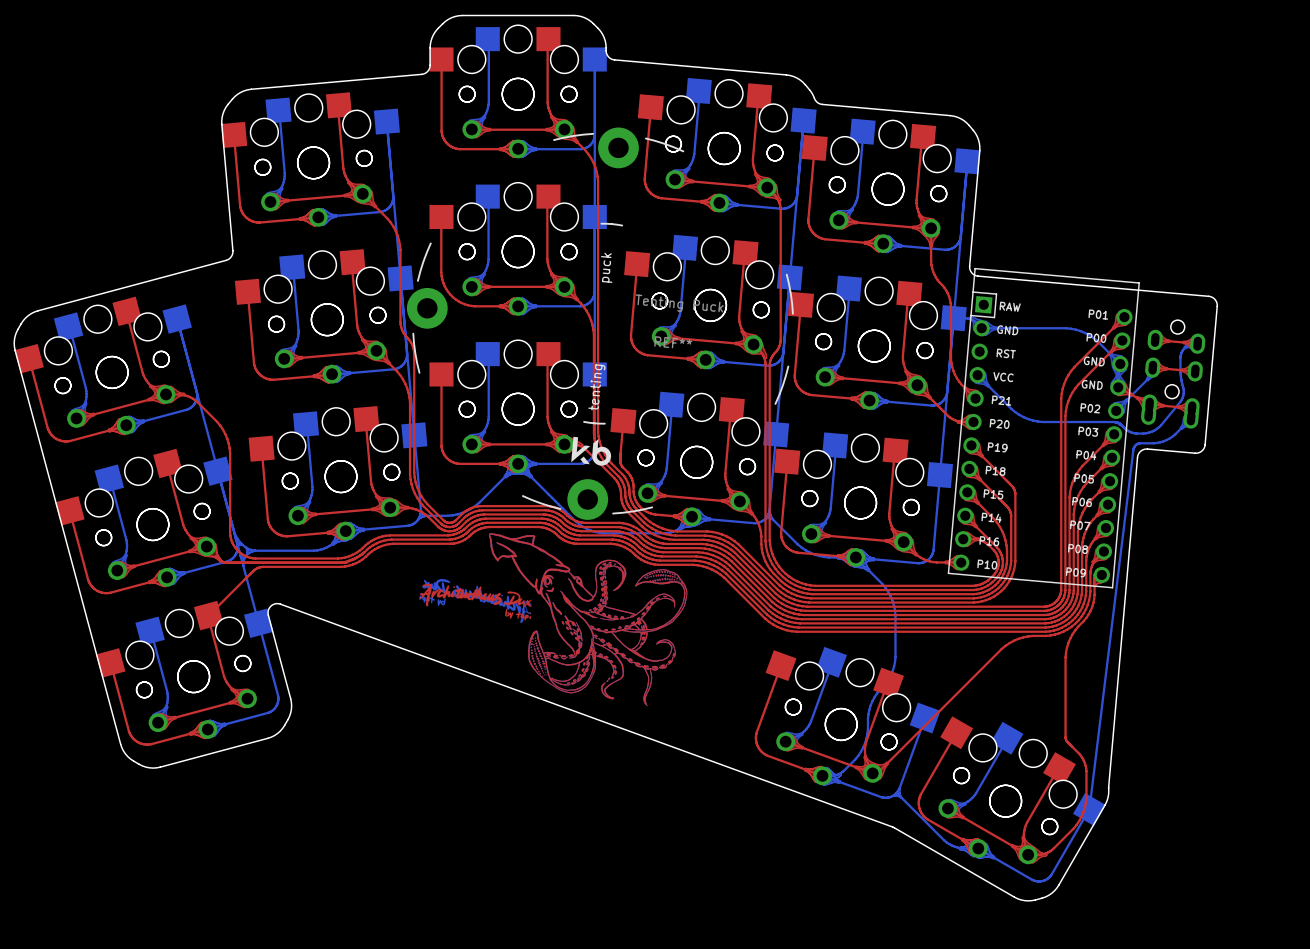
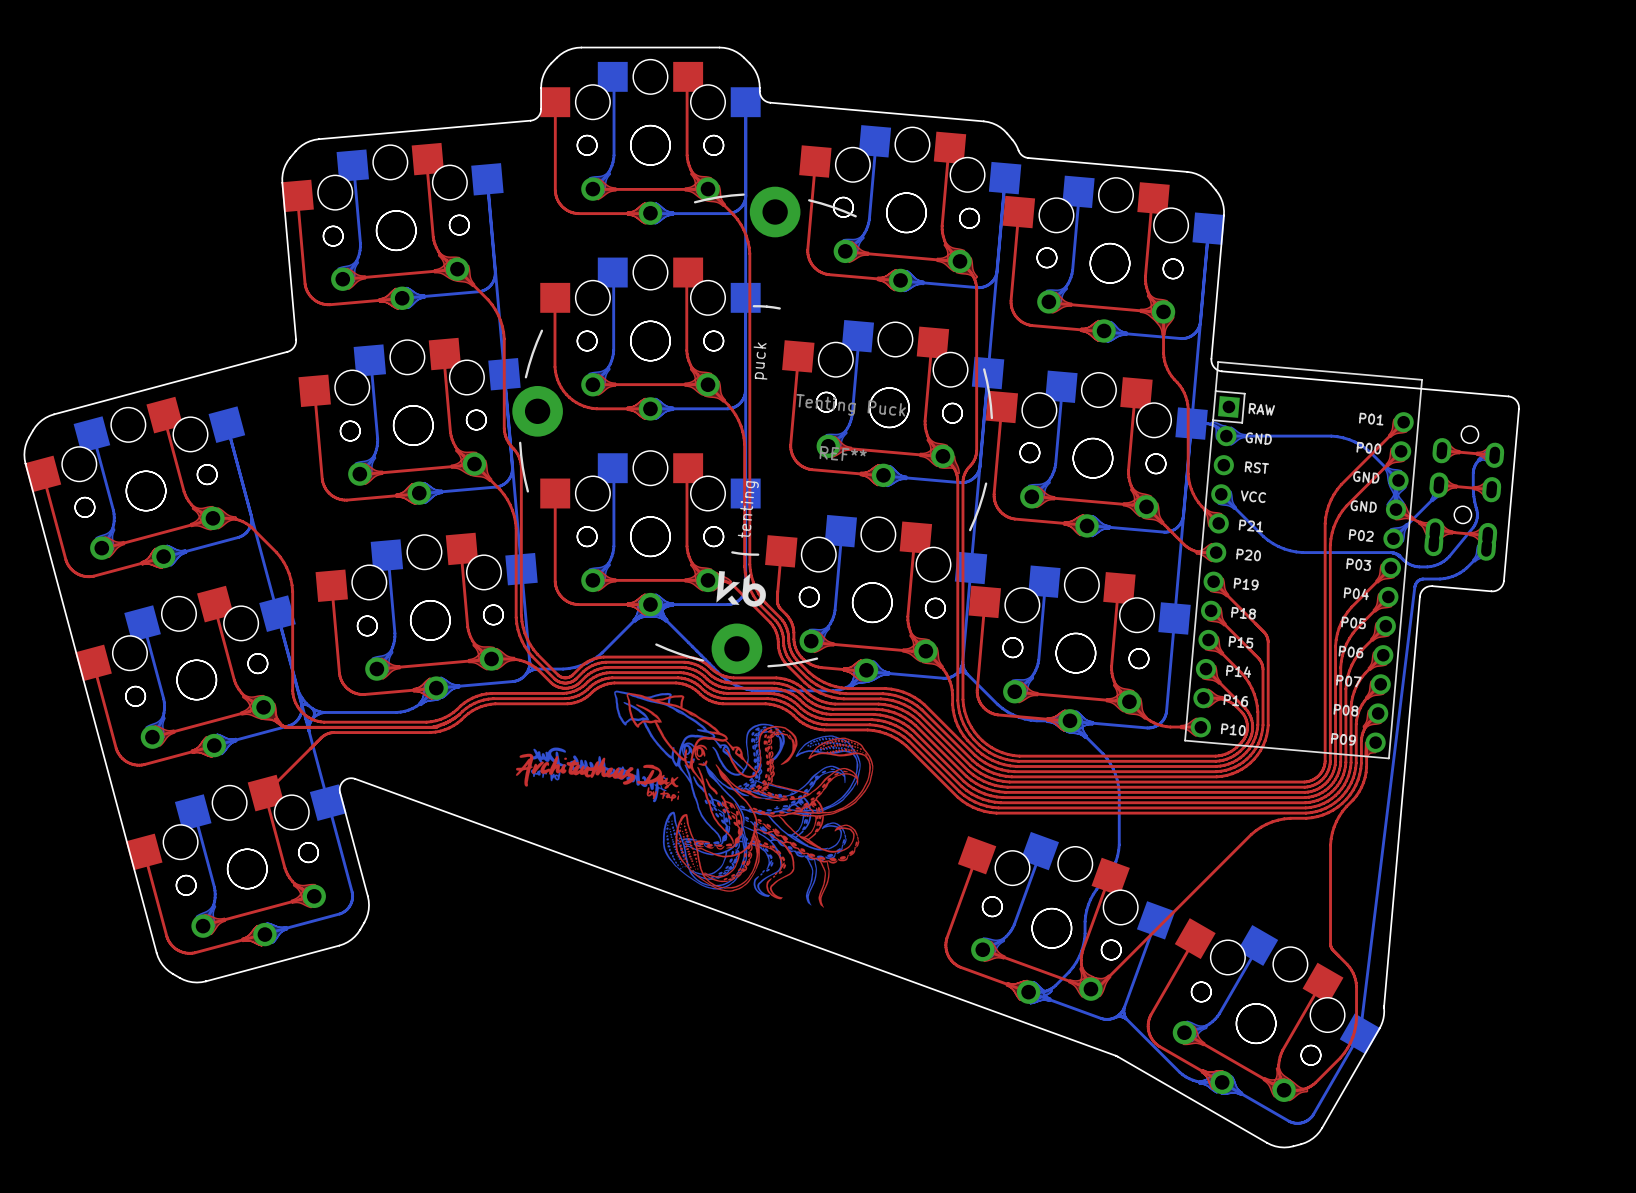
drawing shape: [419, 533, 688, 707] -> [515, 690, 874, 908]

